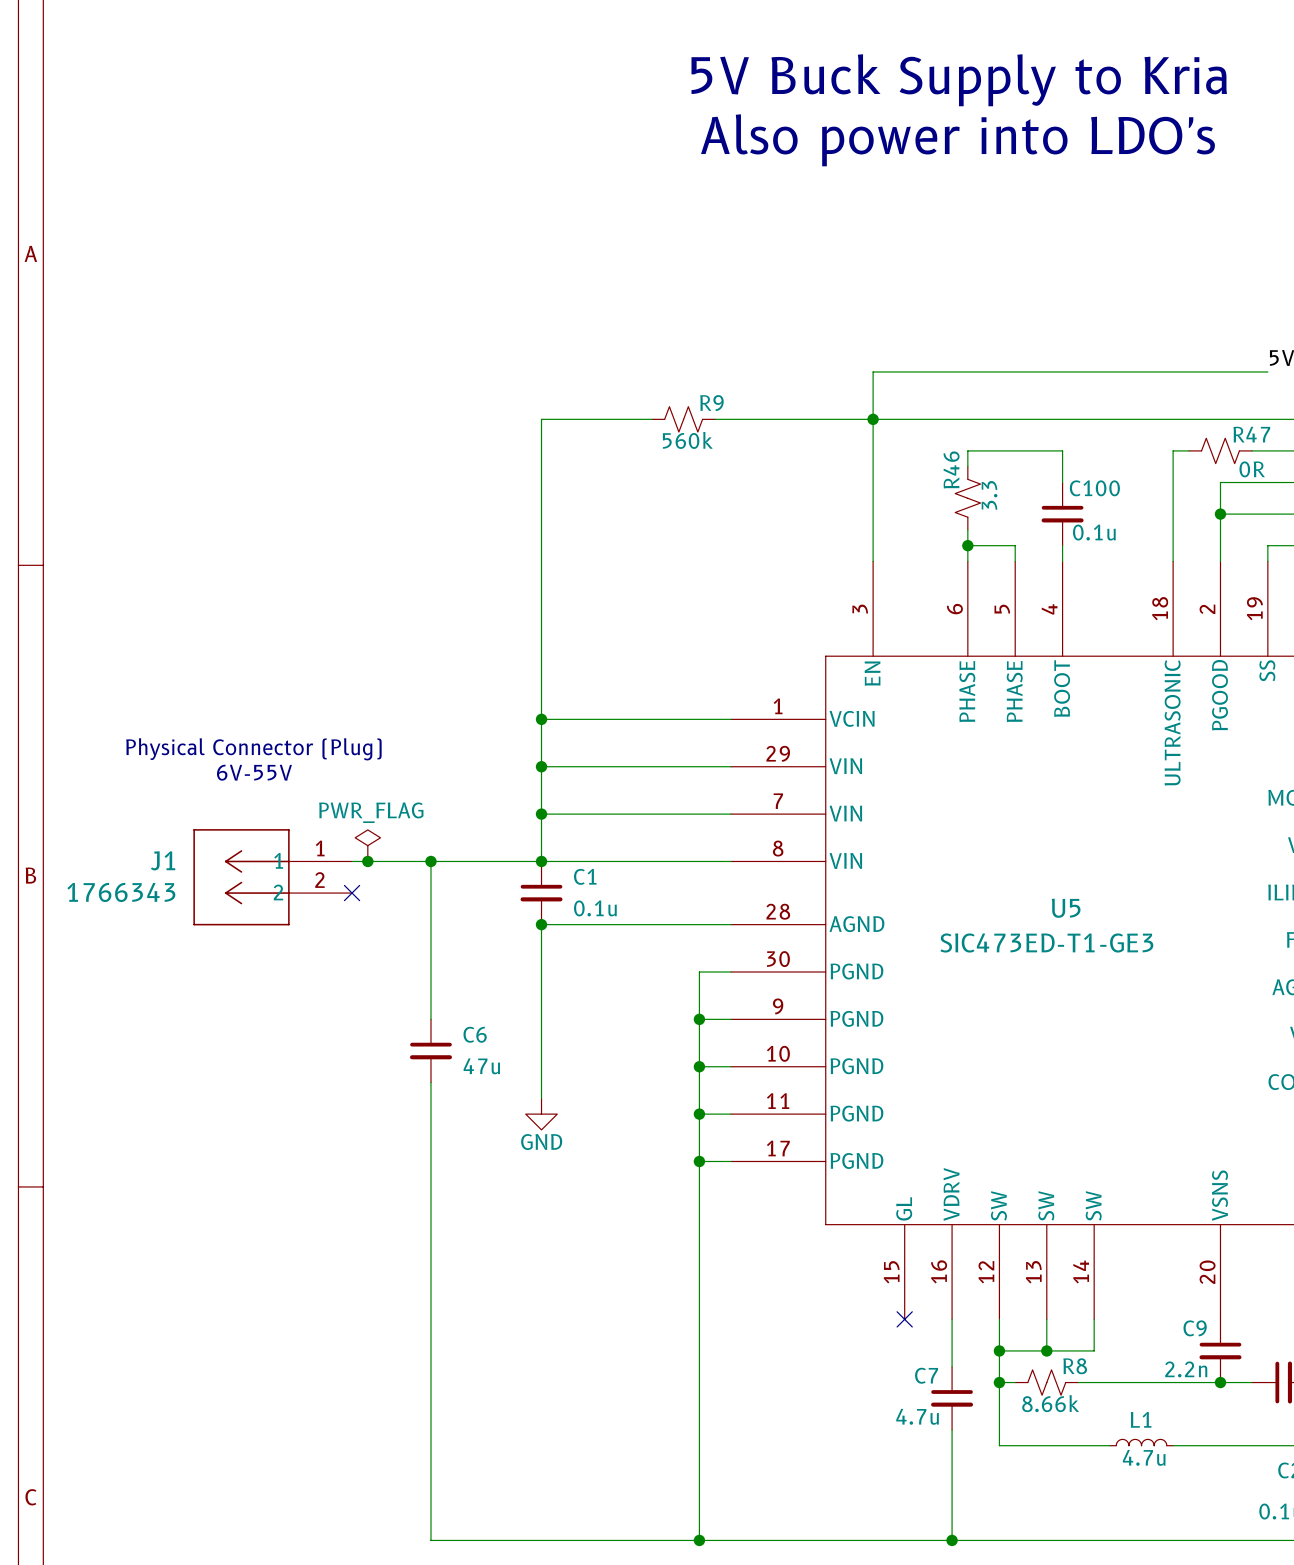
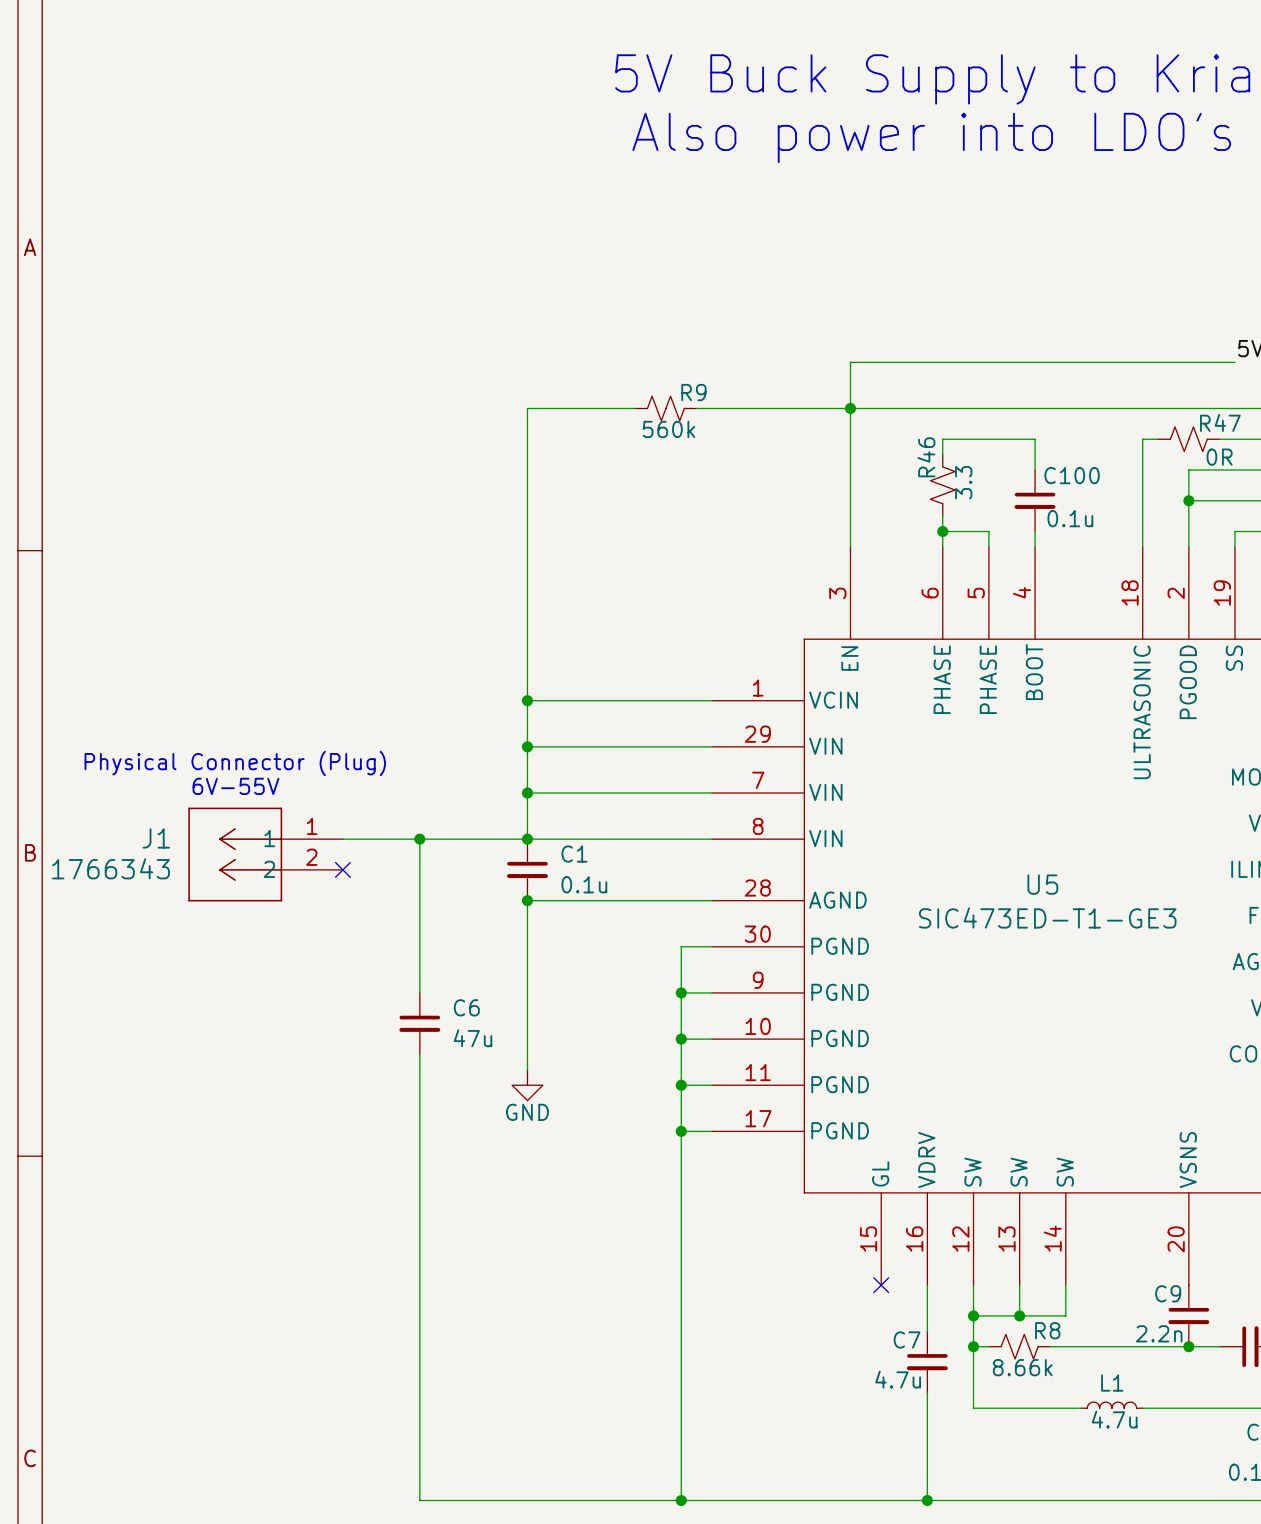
text position: Physical Connector (Plug) (253, 749) -> Physical Connector (Plug) (235, 763)
text position: 6V-55V (254, 772) -> 6V-55V (235, 786)
power symbol: PWR_FLAG (367, 845) -> none
junction: (367, 861) -> none

